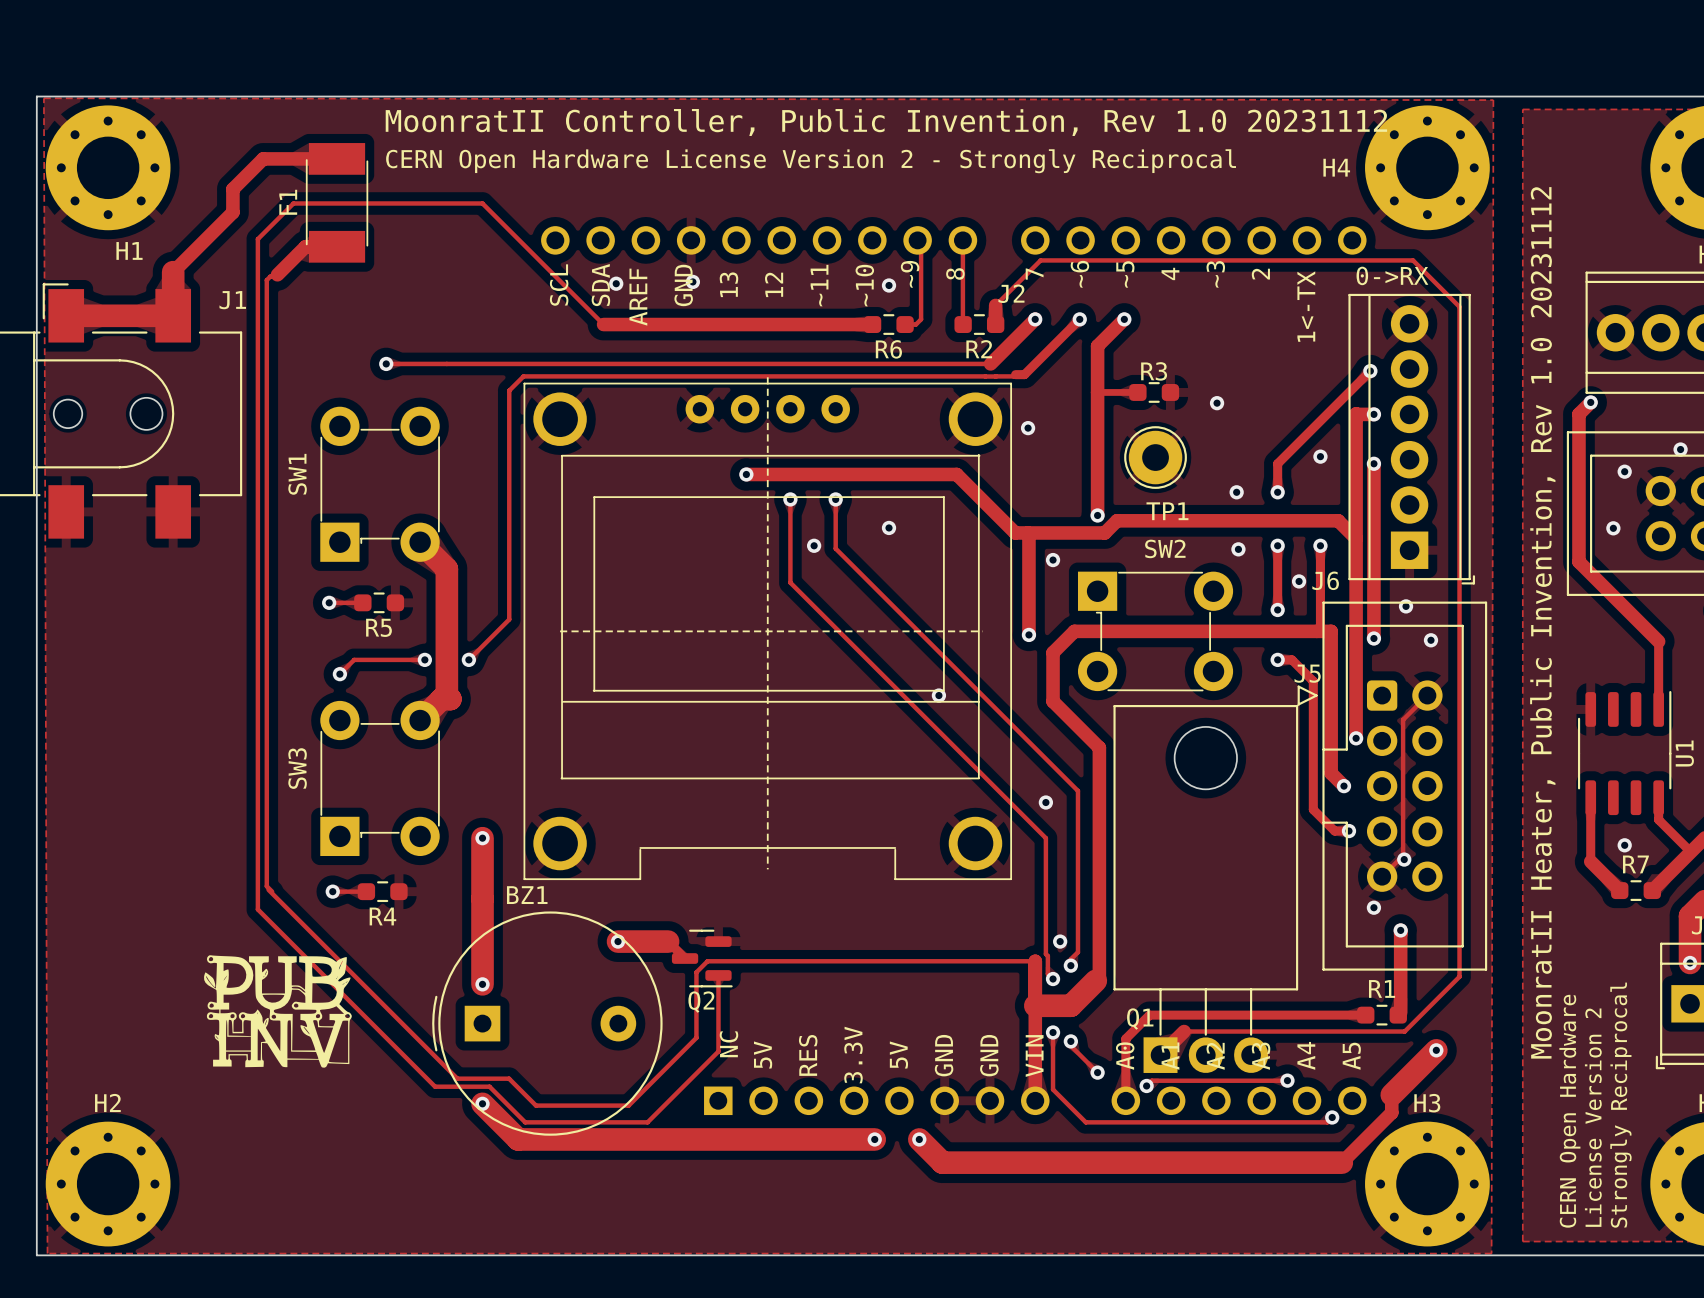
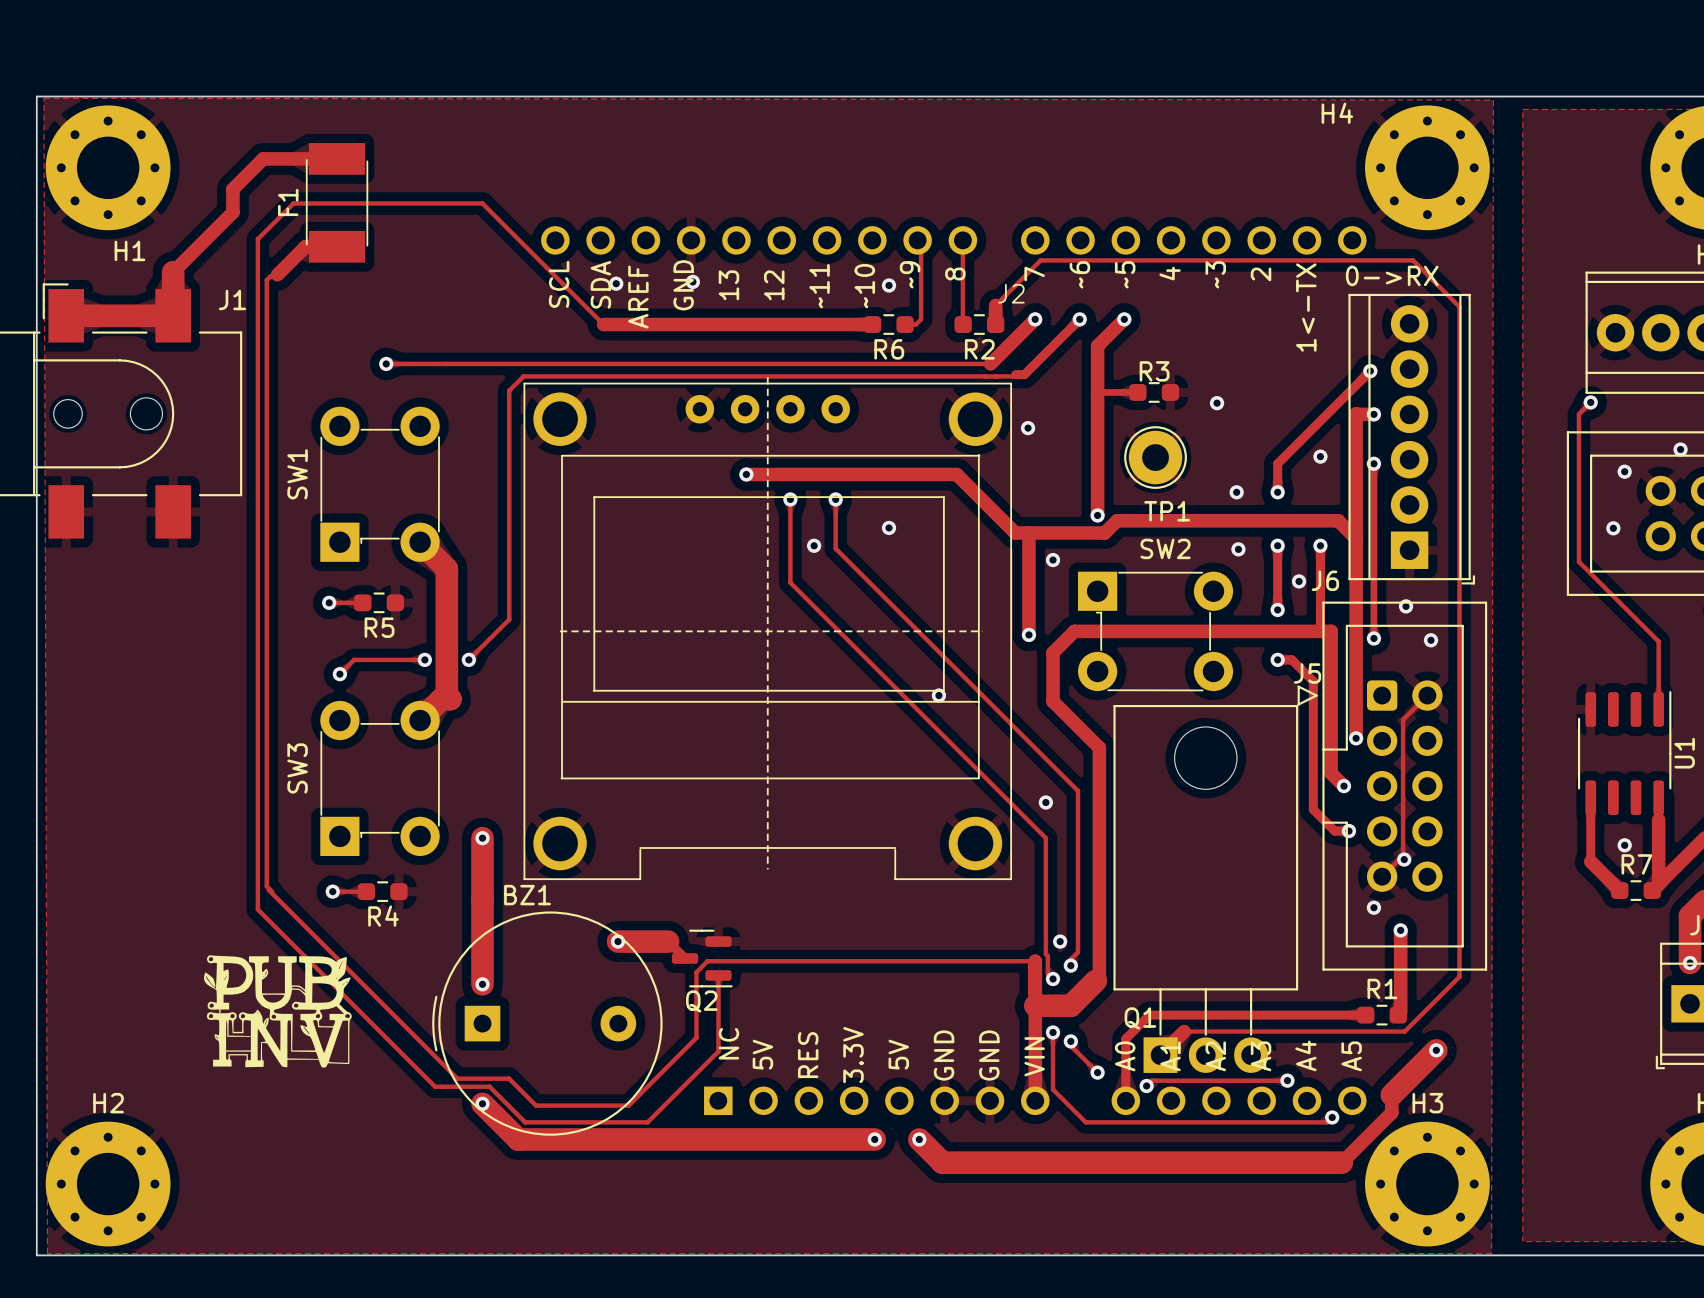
text: MoonratII Controller, Public Invention, Rev 1.0 20231112 (886, 122) -> none
text: CERN Open Hardware License Version 2 - Strongly Reciprocal (811, 161) -> none
H4 name position: H4 (1336, 167) -> H4 (1337, 113)
track width: thick (1590, 402) (1578, 414) (1578, 561) (1658, 641) (1658, 709) -> thin (1590, 402) (1578, 414) (1578, 561) (1658, 641) (1658, 709)
track width: thick (1373, 463) (1373, 638) -> thin (1373, 463) (1373, 638)
text: MoonratII Heater, Public Invention, Rev 1.0 20231112 (1542, 622) -> none
track: (1658, 819) (1690, 852) -> (1658, 819) (1658, 884) (1652, 889)
text: Strongly Reciprocal (1620, 1105) -> none
text: CERN Open Hardware (1569, 1111) -> none
text: License Version 2 (1593, 1117) -> none

